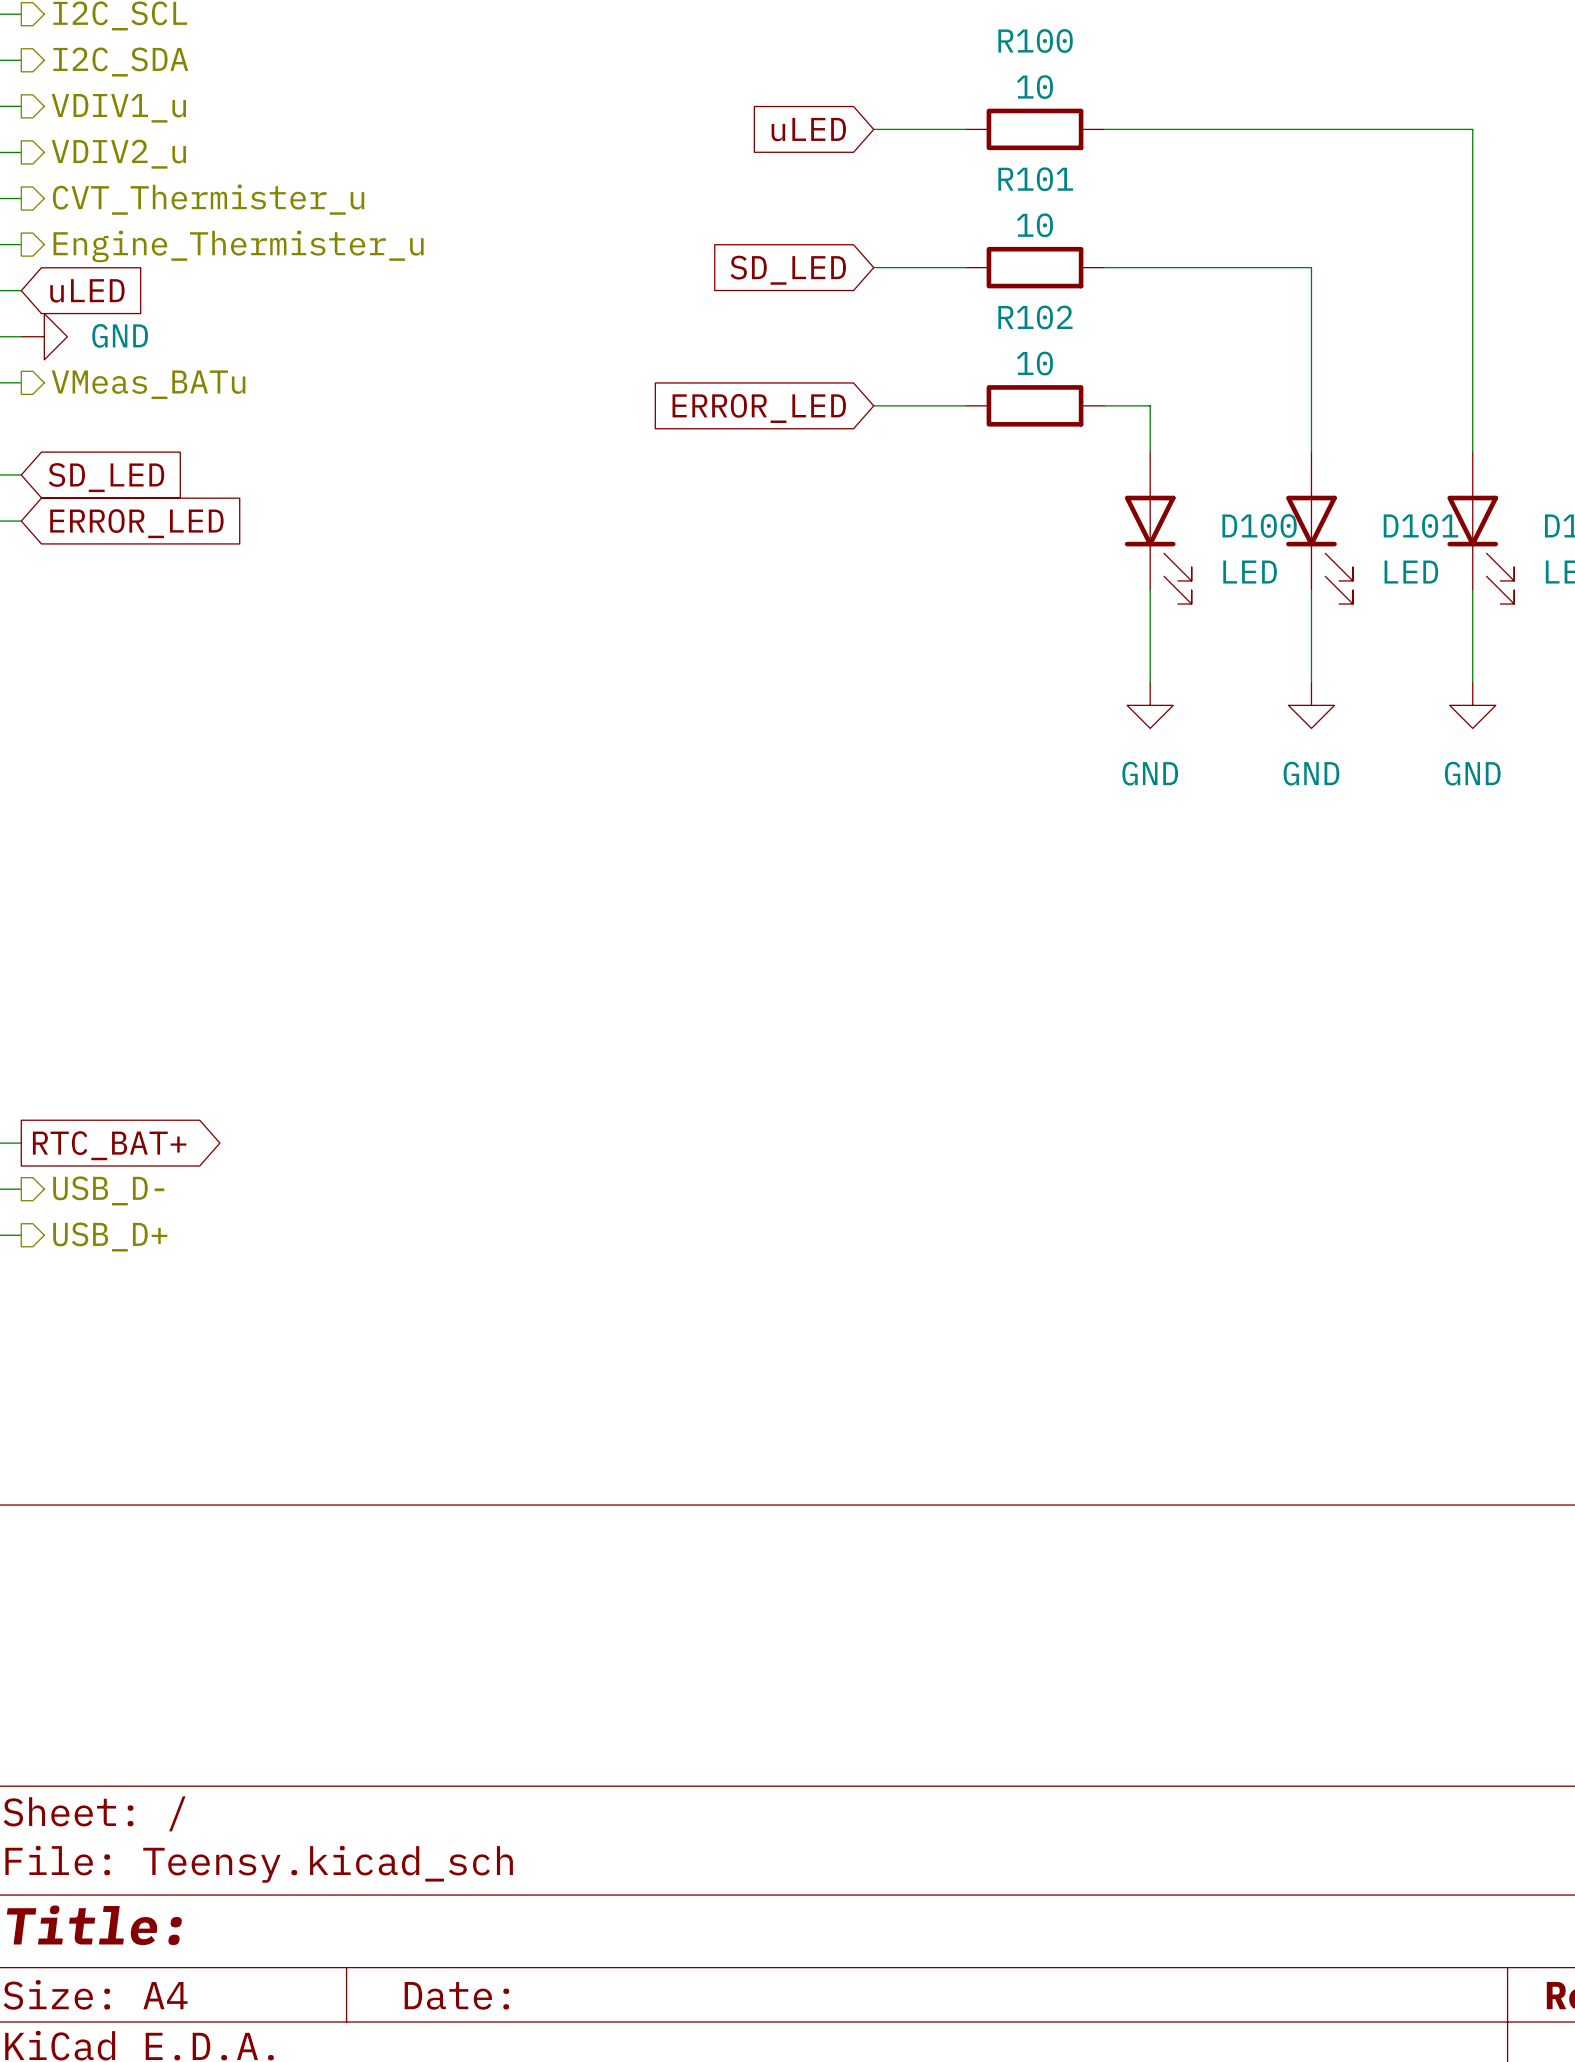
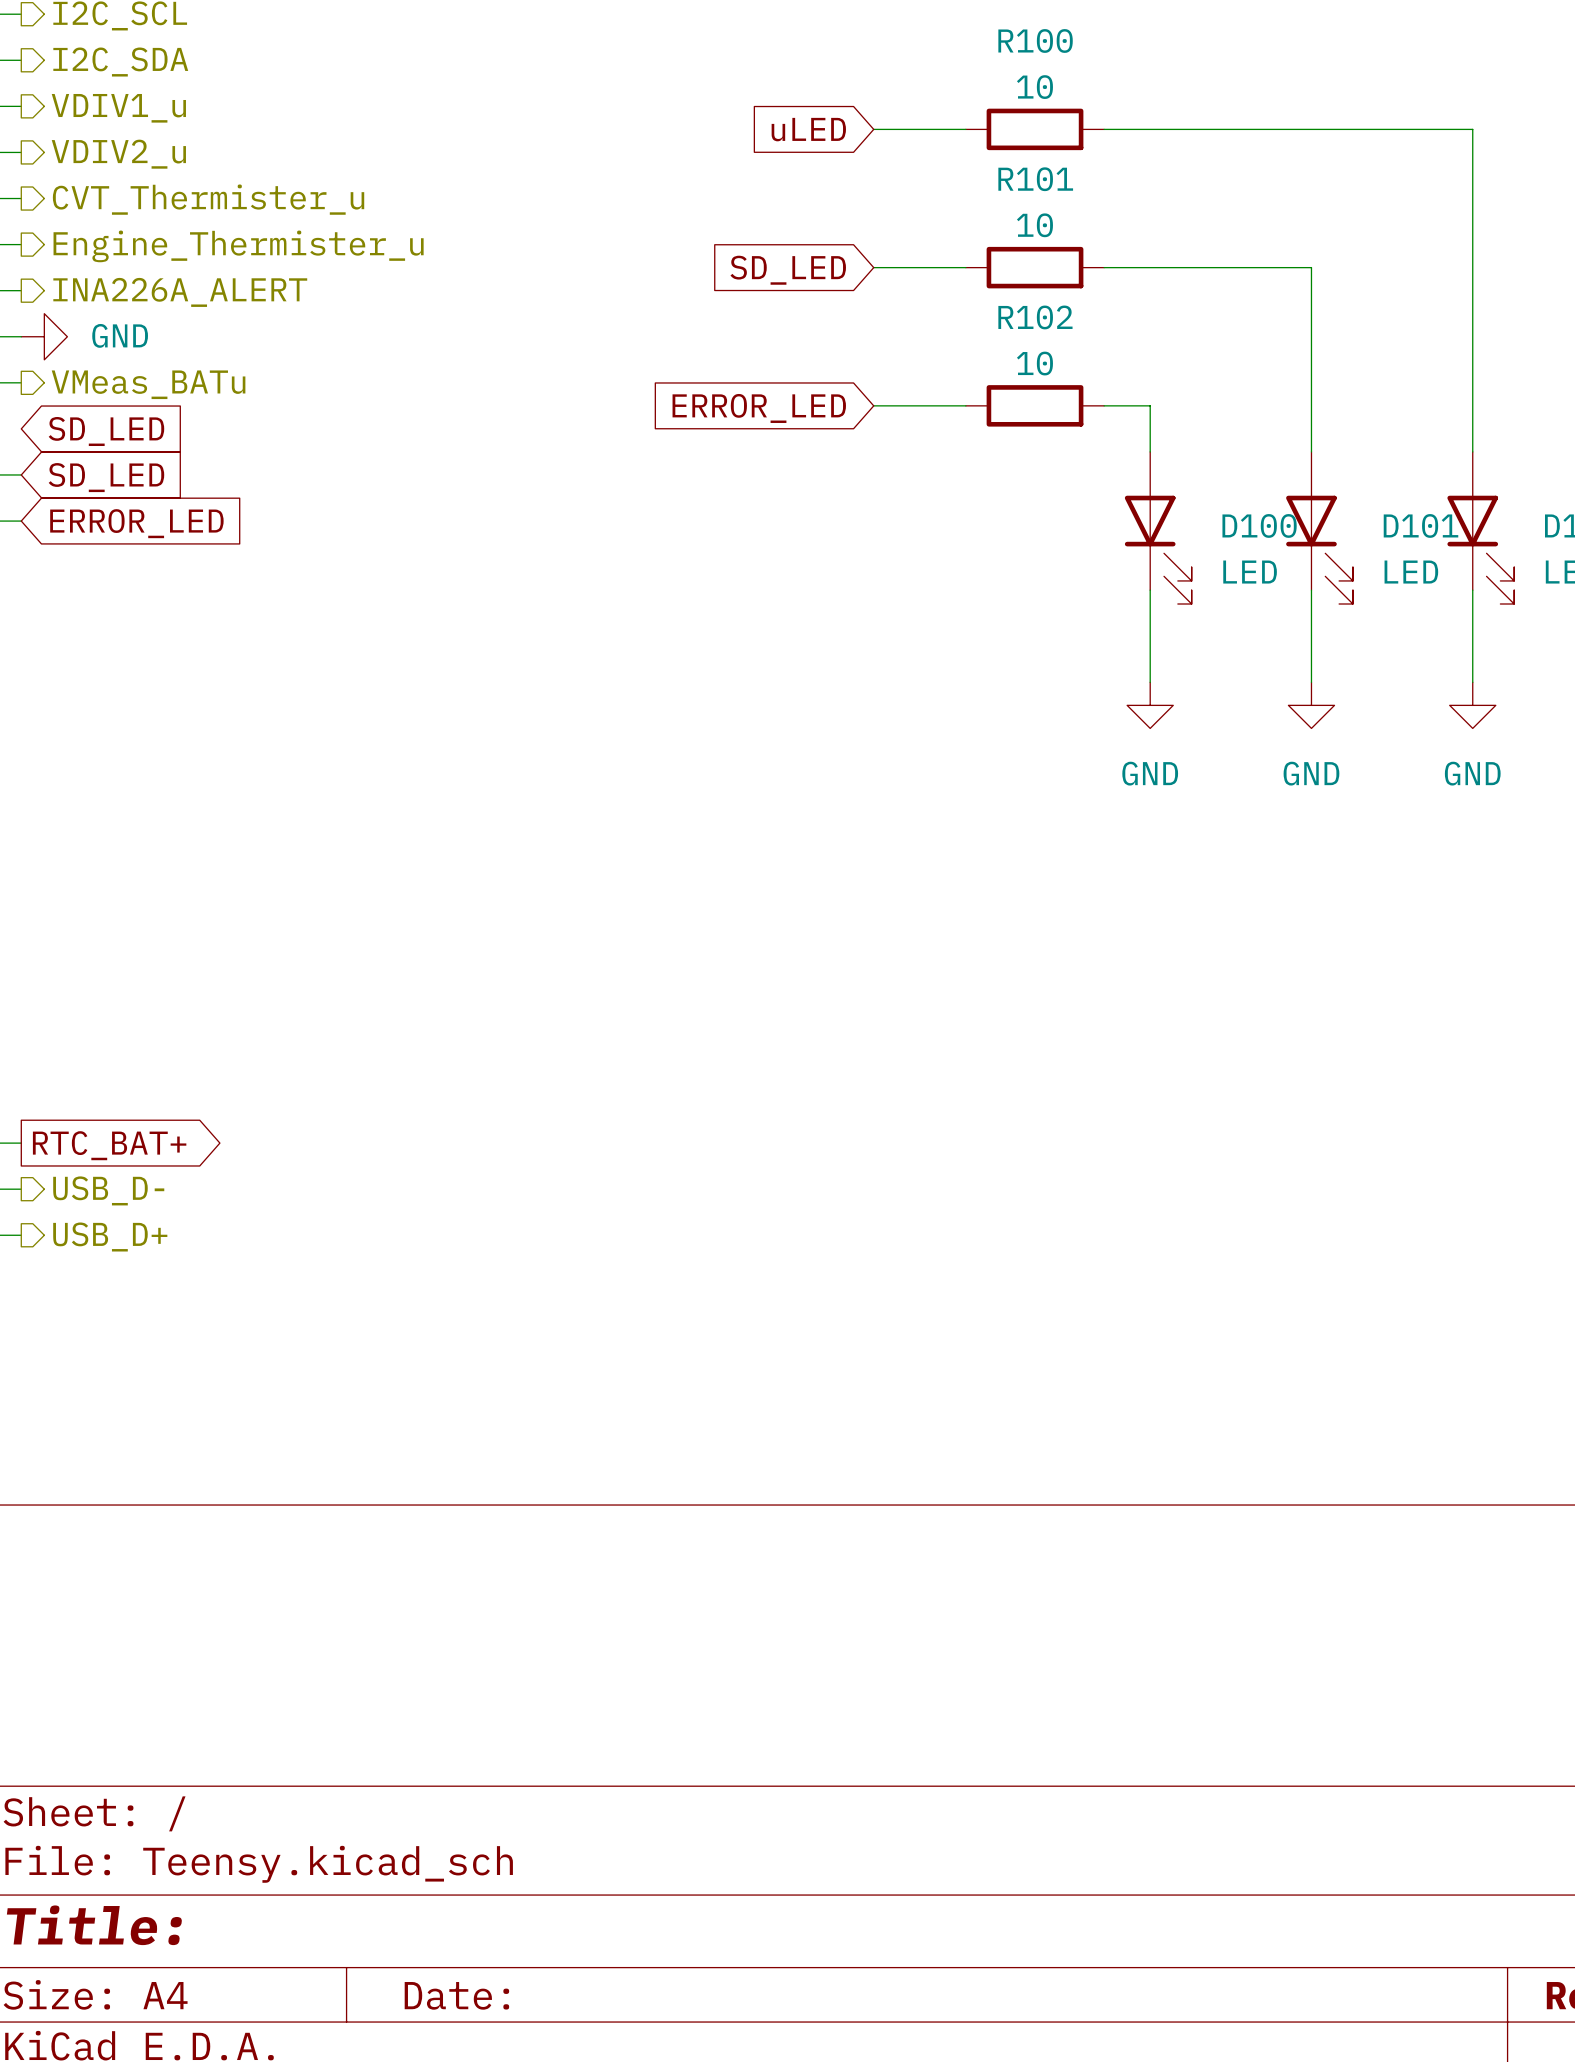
global label: uLED (87, 290) -> none
hierarchical label: none -> INA226A_ALERT (180, 292)
global label: none -> SD_LED (106, 431)

